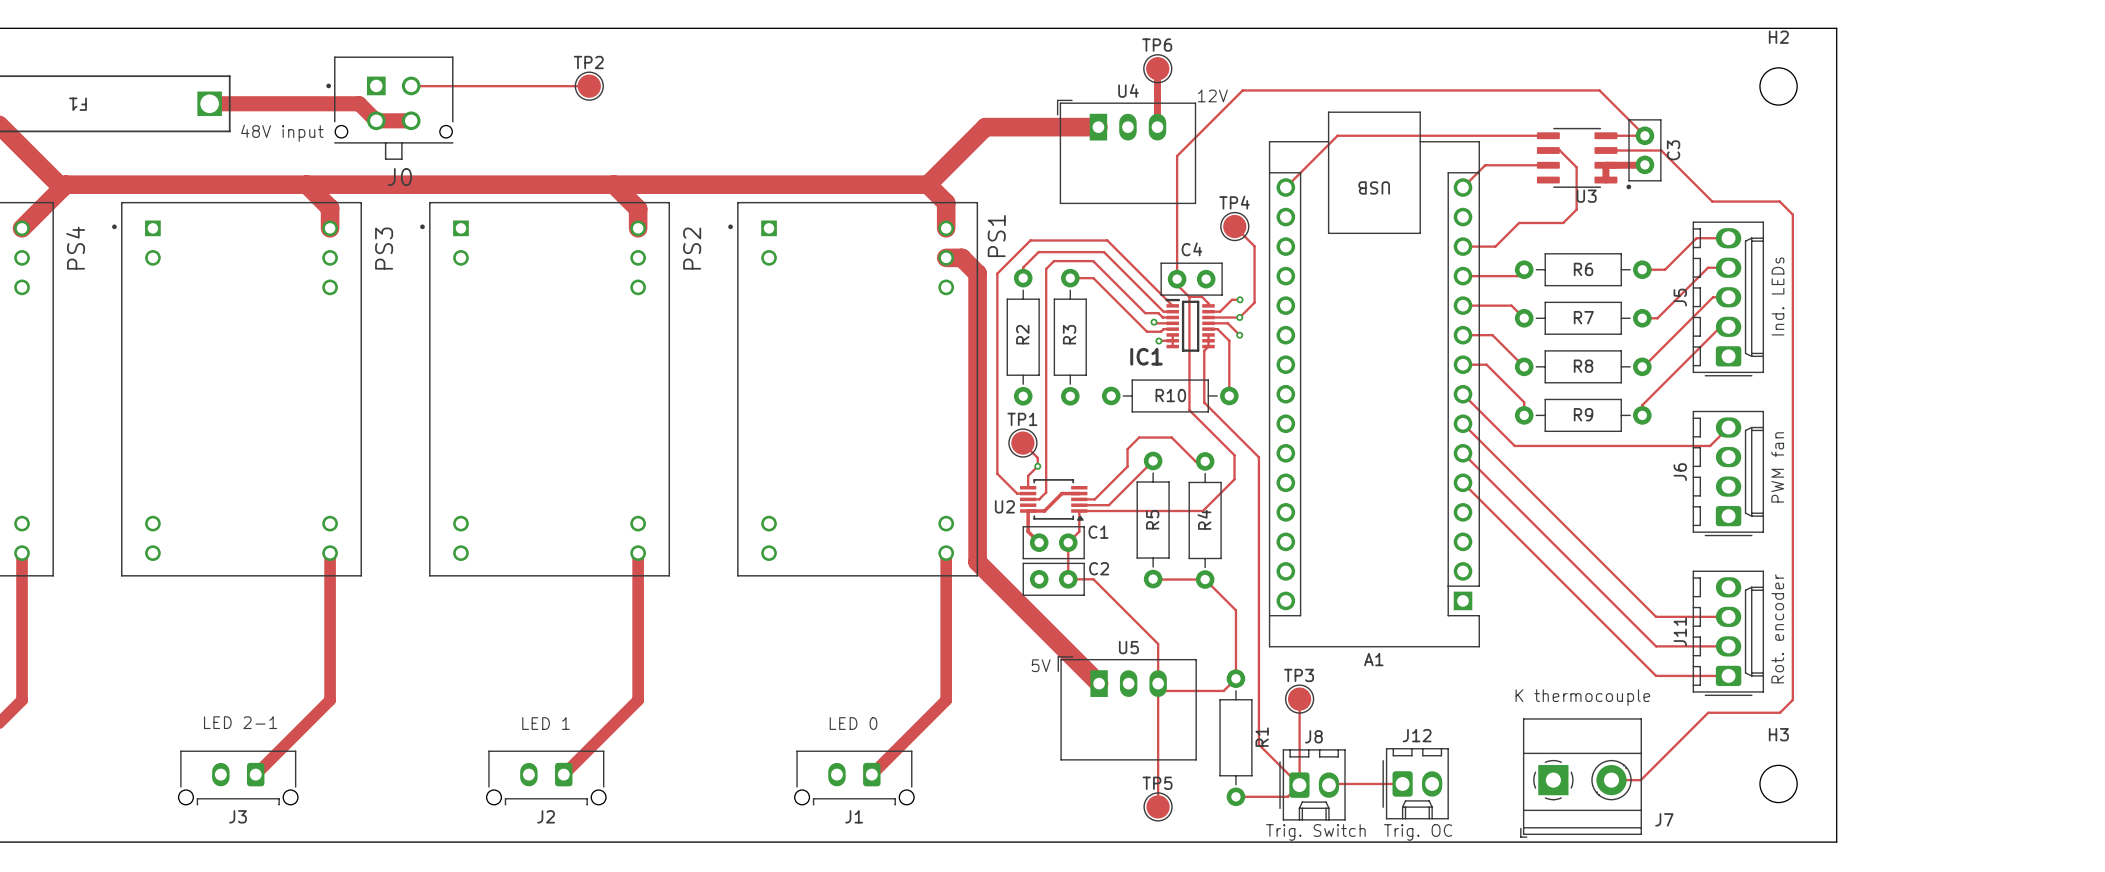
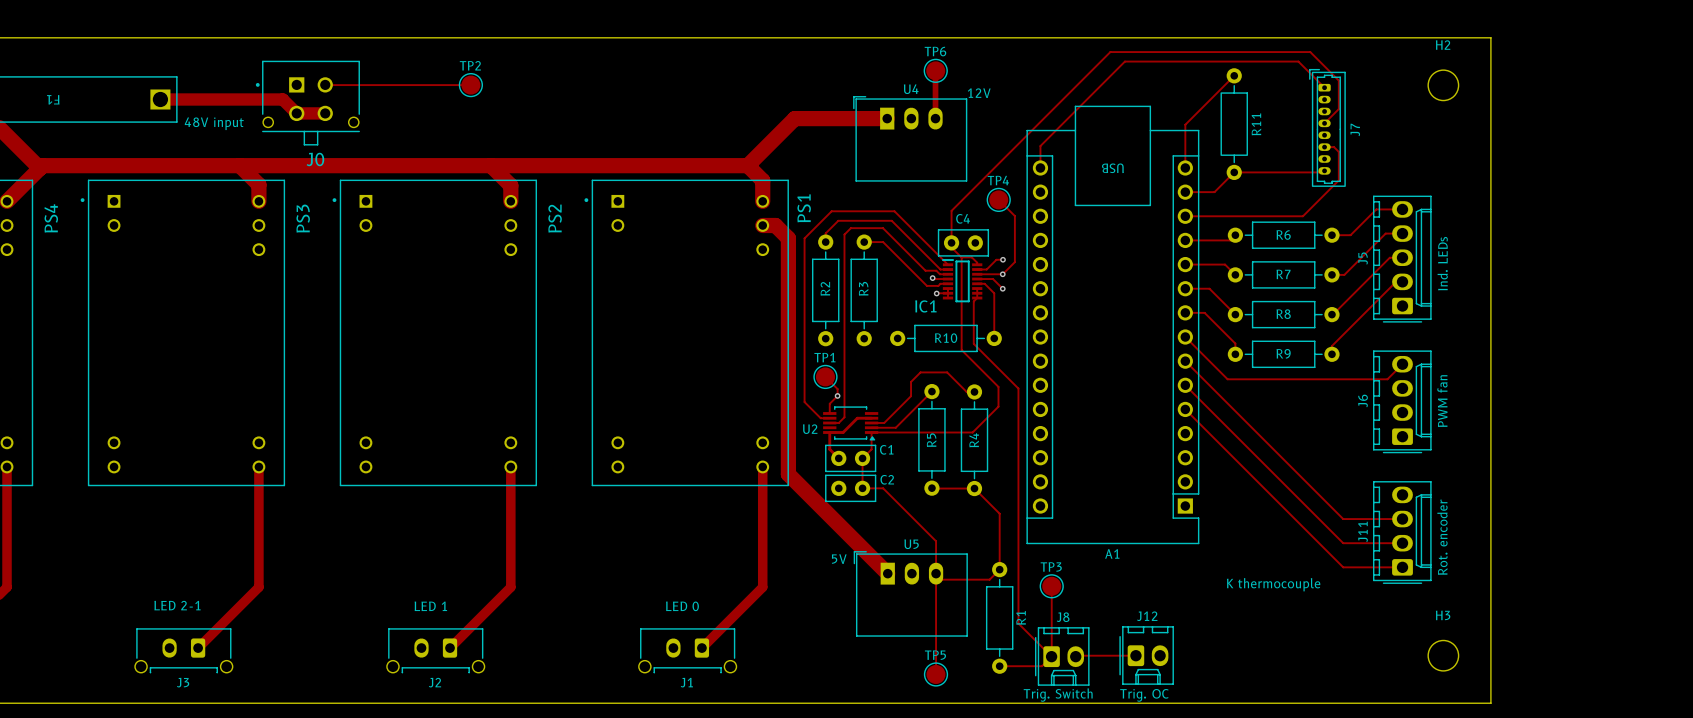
R11: none -> (1234, 124)
track: (1548, 135) (1337, 135) (1285, 187) -> (1324, 87) (1298, 61) (1124, 61) (1040, 146) (1040, 167)
track: (1605, 135) (1644, 135) (1599, 90) (1242, 90) (1177, 156) (1177, 239) -> (1324, 123) (1338, 109) (1338, 80) (1310, 52) (1110, 52) (951, 210)
track: (1548, 150) (1559, 150) (1576, 167) (1576, 209) (1563, 222) (1519, 222) (1495, 246) -> (1324, 147) (1334, 147) (1338, 151) (1338, 180) (1302, 216) (1211, 216)
track: (1605, 150) (1661, 150) (1712, 201) (1779, 201) (1792, 214) (1792, 699) (1780, 712) (1708, 712) (1640, 780) (1611, 780) -> none
C3: (1644, 150) -> none
U3: (1584, 158) -> none
track: (1644, 164) (1605, 165) (1605, 180) -> none
track: (1548, 165) (1485, 165) (1462, 187) -> (1234, 75) (1185, 124) (1185, 167)
track: none -> (1324, 170) (1234, 172) (1214, 192) (1185, 192)
J7 footprint: [1520, 718, 1642, 838] -> [1309, 69, 1346, 187]
J7 name position: J7 (1664, 819) -> J7 (1355, 129)

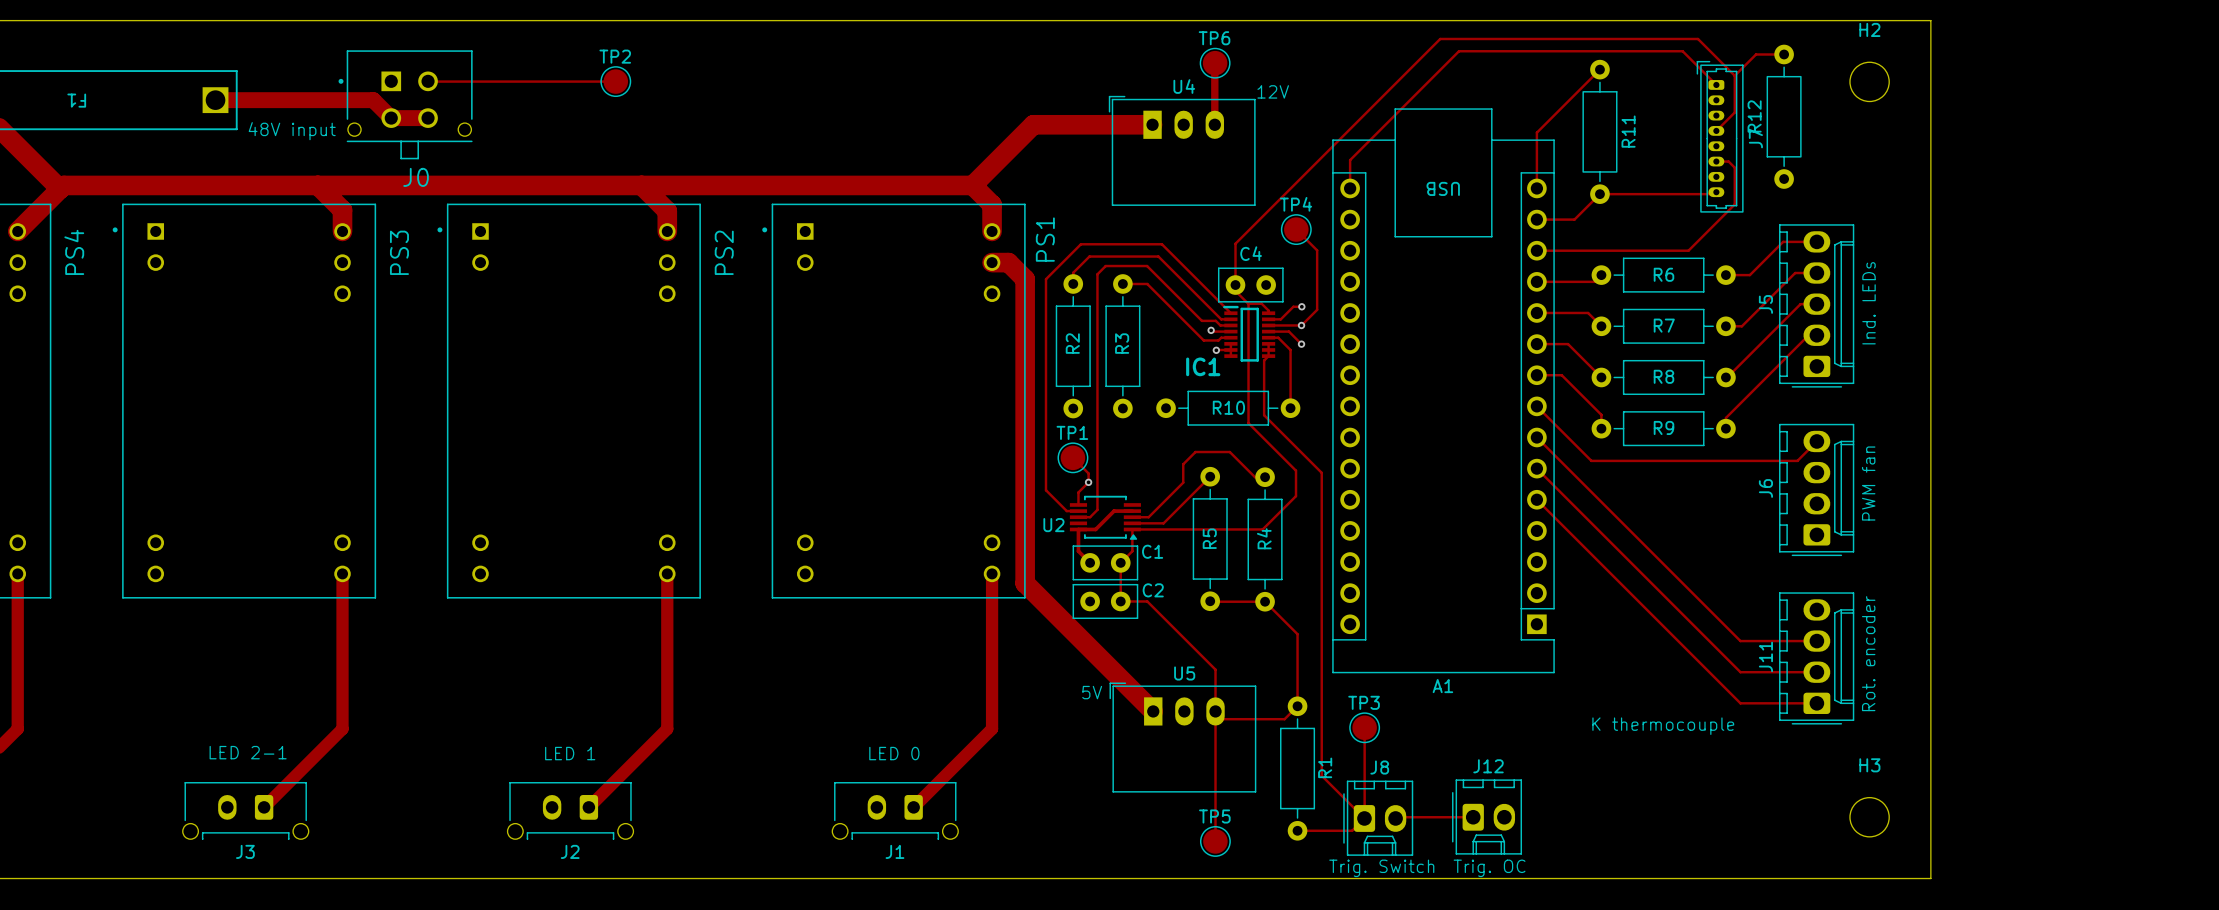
track: none -> (1784, 54) (1756, 54) (1734, 75)
R12: none -> (1784, 116)

